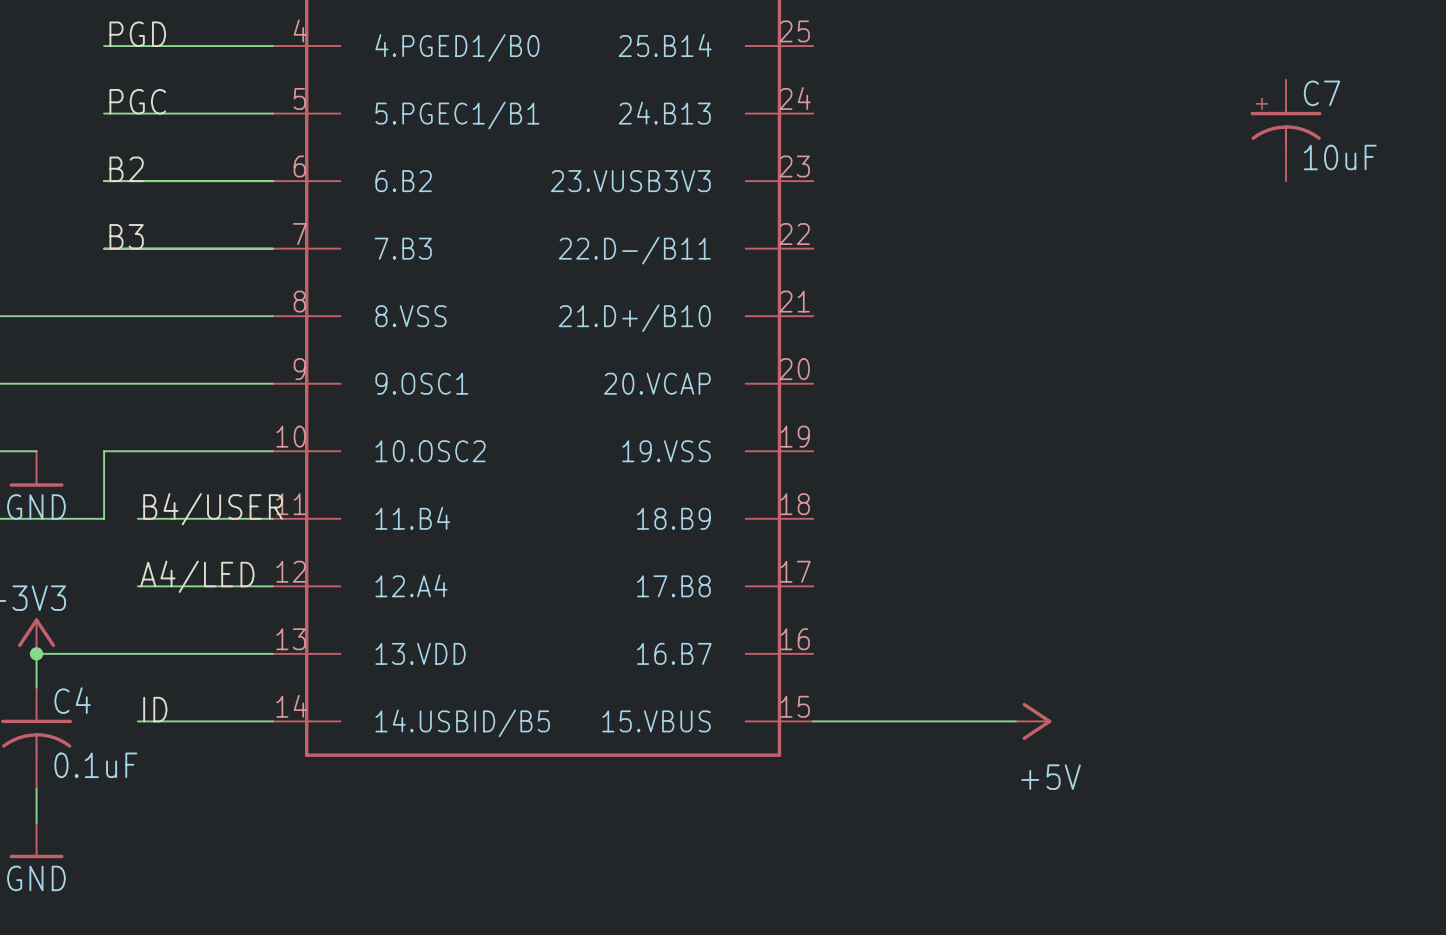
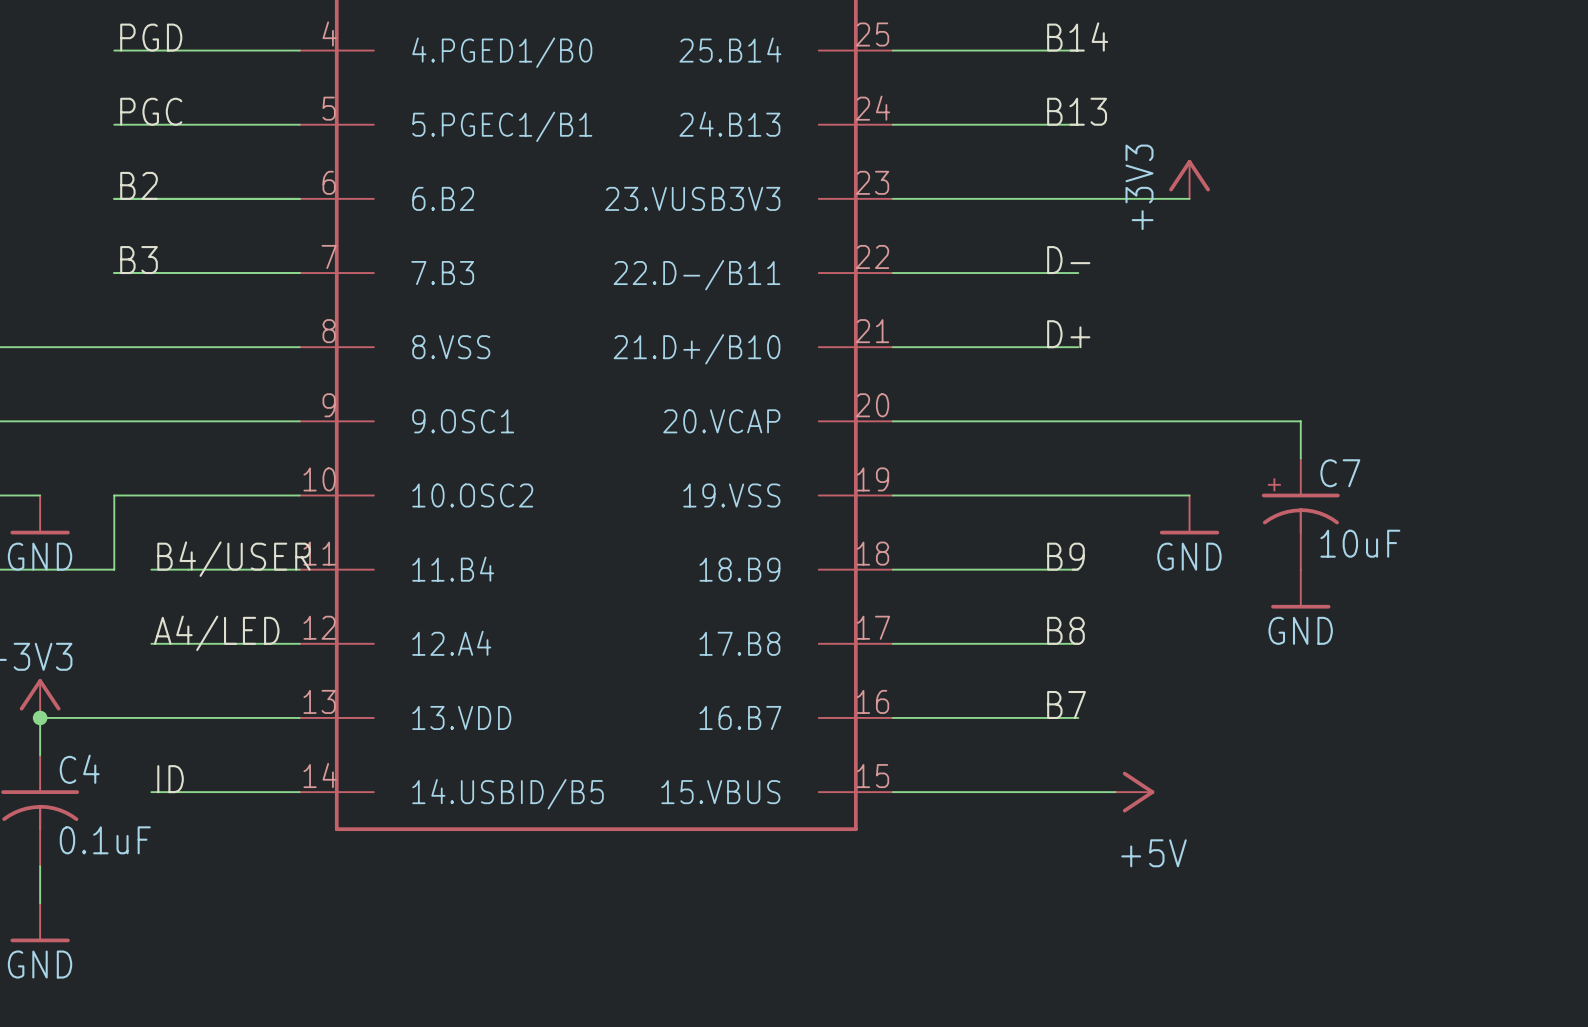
label: none -> B14 (1077, 36)
wire: none -> (892, 50) (1078, 50)
label: none -> B13 (1077, 111)
wire: none -> (892, 124) (1078, 124)
C7 position: (1285, 130) -> (1300, 514)
power symbol: none -> +3V3 (1189, 179)
wire: none -> (892, 198) (1189, 198)
label: none -> D- (1068, 260)
wire: none -> (892, 273) (1078, 273)
label: none -> D+ (1068, 334)
wire: none -> (892, 347) (1078, 347)
wire: none -> (892, 421) (1300, 421) (1300, 458)
wire: none -> (892, 495) (1189, 495)
power symbol: none -> GND (1189, 514)
label: none -> B9 (1065, 556)
wire: none -> (892, 569) (1078, 569)
power symbol: none -> GND (1300, 589)
label: none -> B8 (1065, 630)
wire: none -> (892, 643) (1078, 643)
label: none -> B7 (1066, 704)
wire: none -> (892, 717) (1078, 717)

